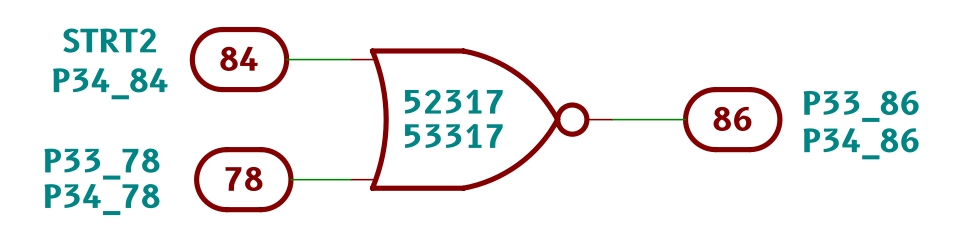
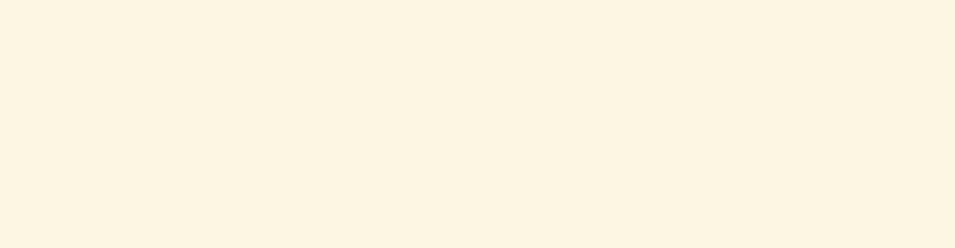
part: (239, 59) -> none
wire: (286, 59) (351, 59) -> none
part: (481, 119) -> none
wire: (612, 119) (685, 119) -> none
part: (732, 119) -> none
part: (243, 179) -> none
wire: (290, 179) (351, 179) -> none

